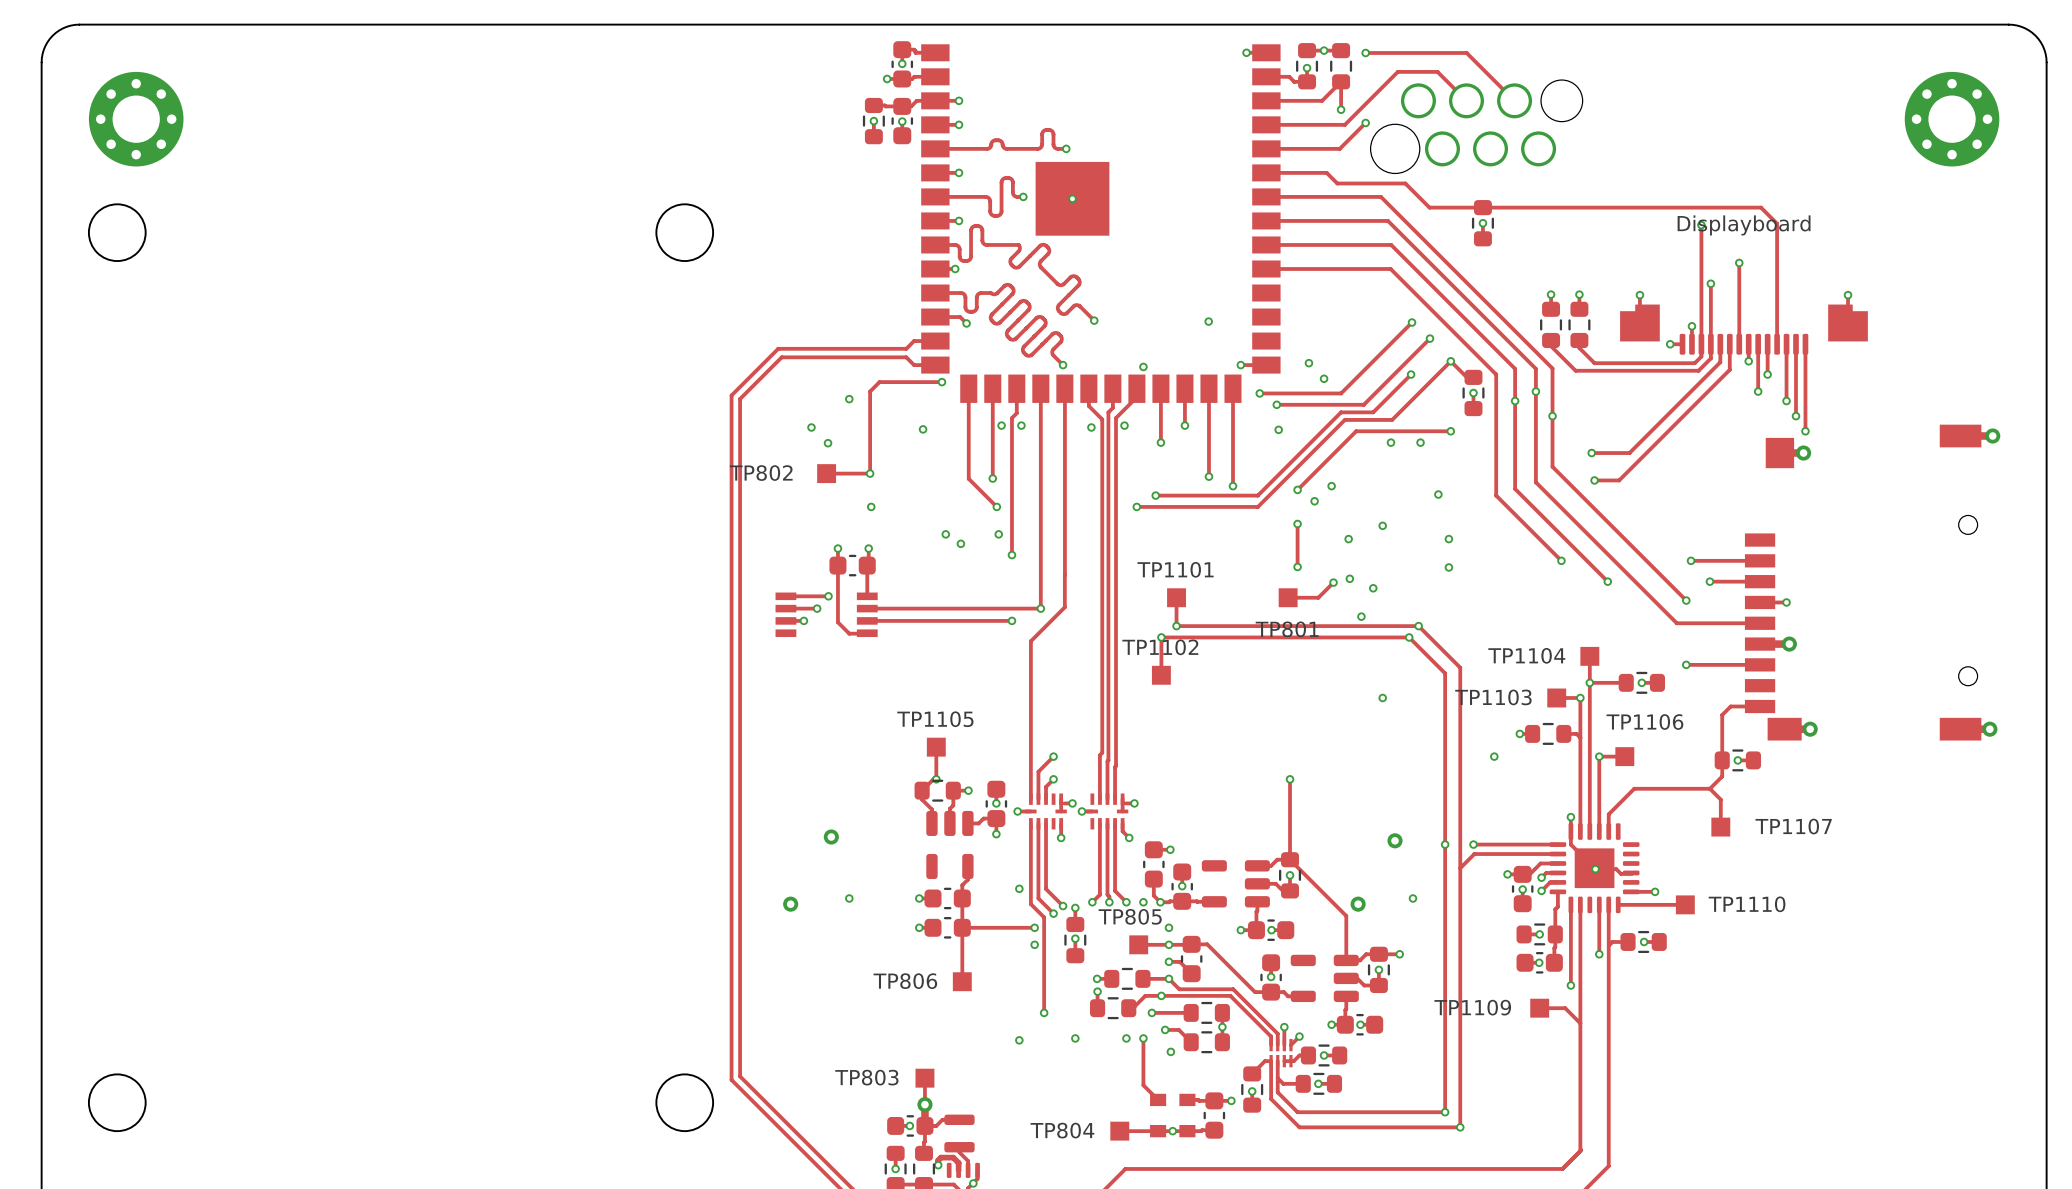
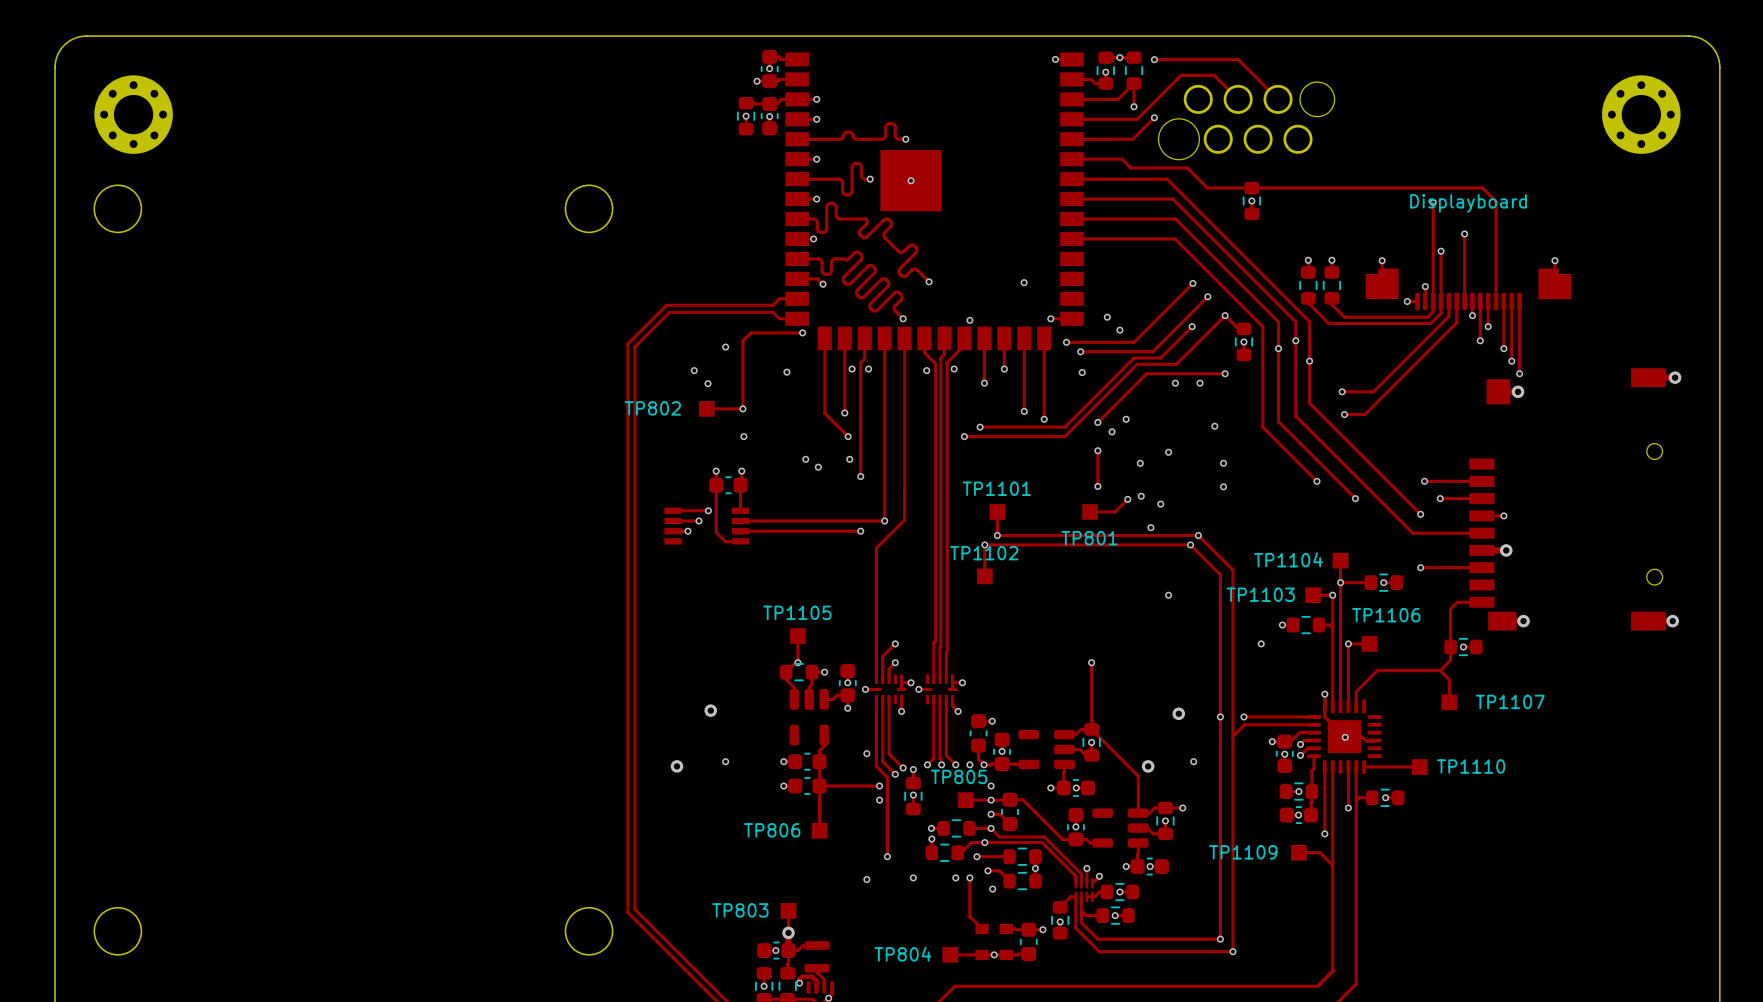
track: (1631, 891) (1655, 891) -> none
via: (1655, 891) -> none

